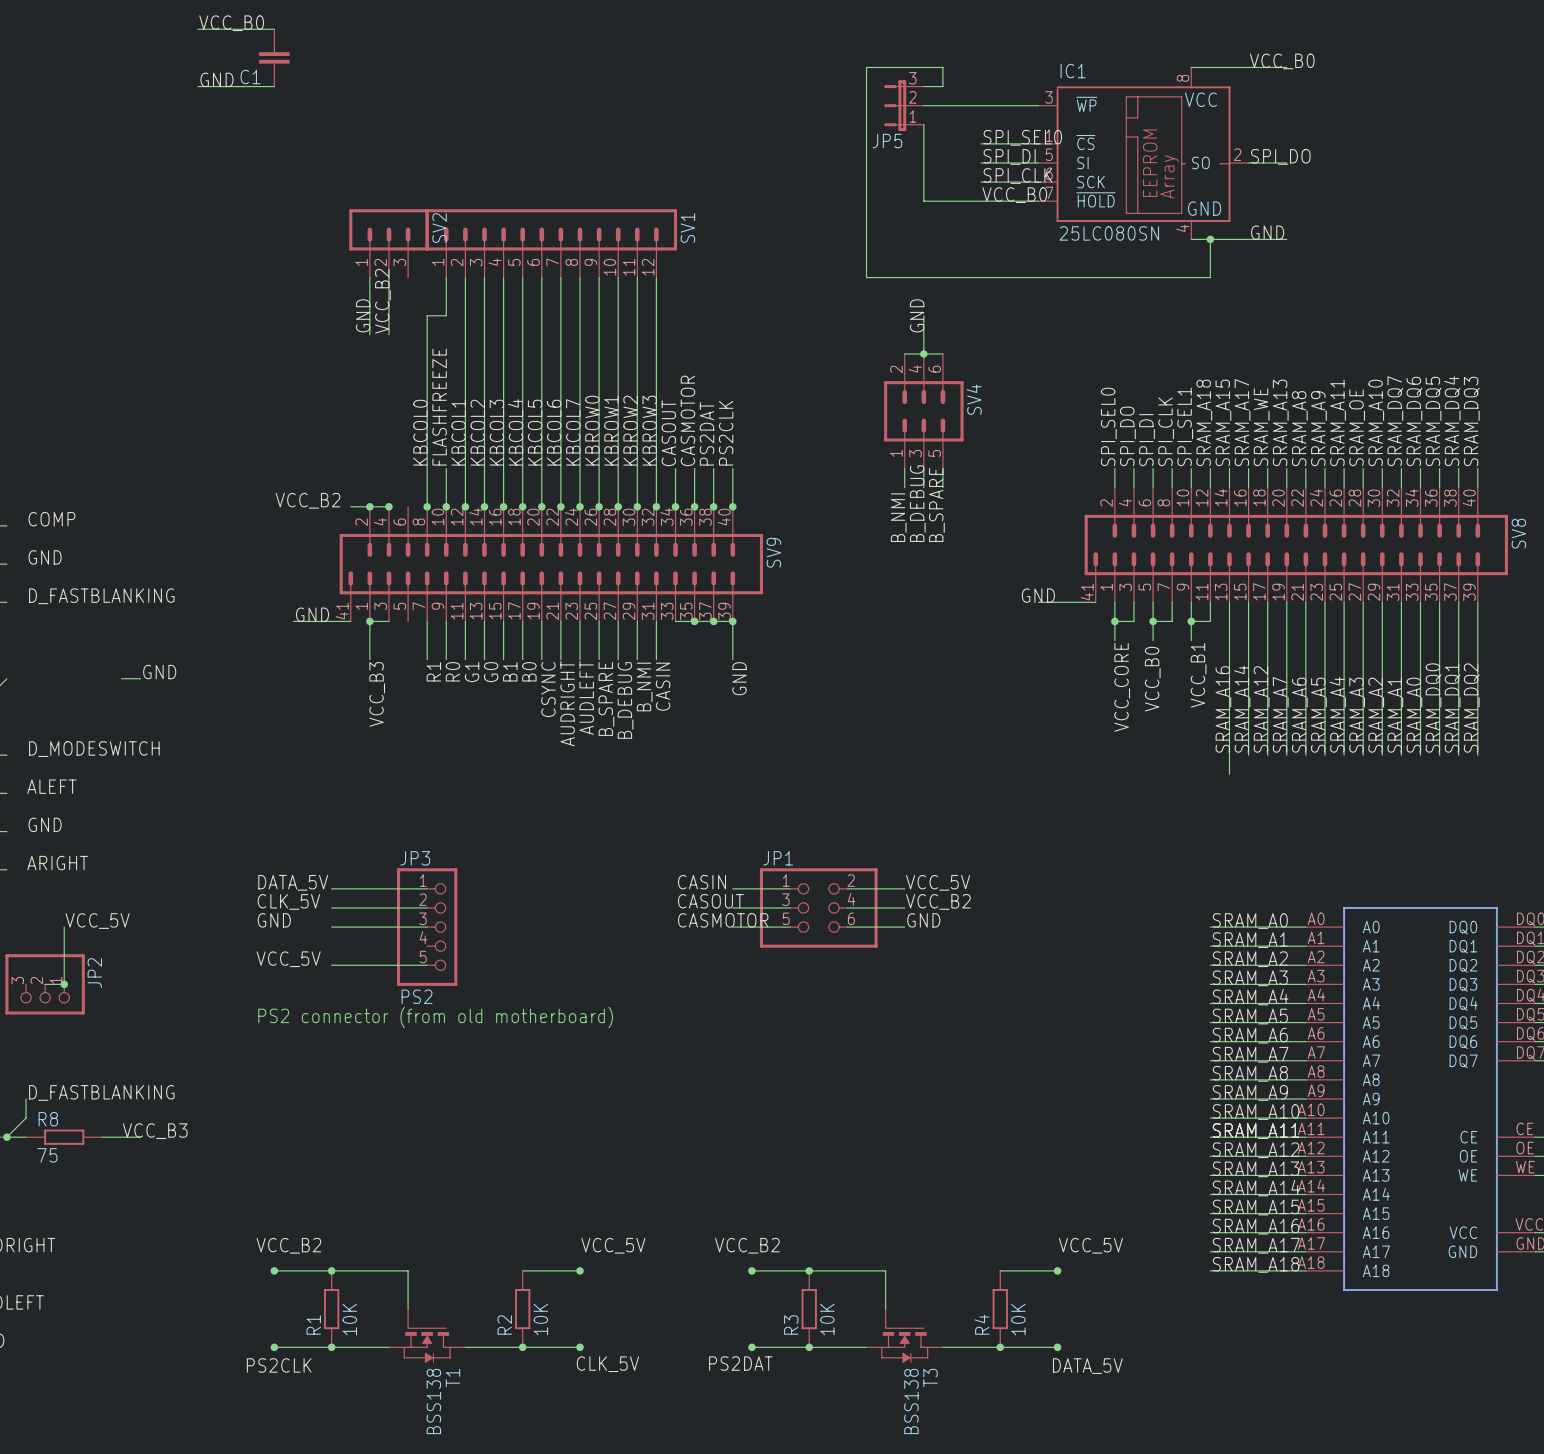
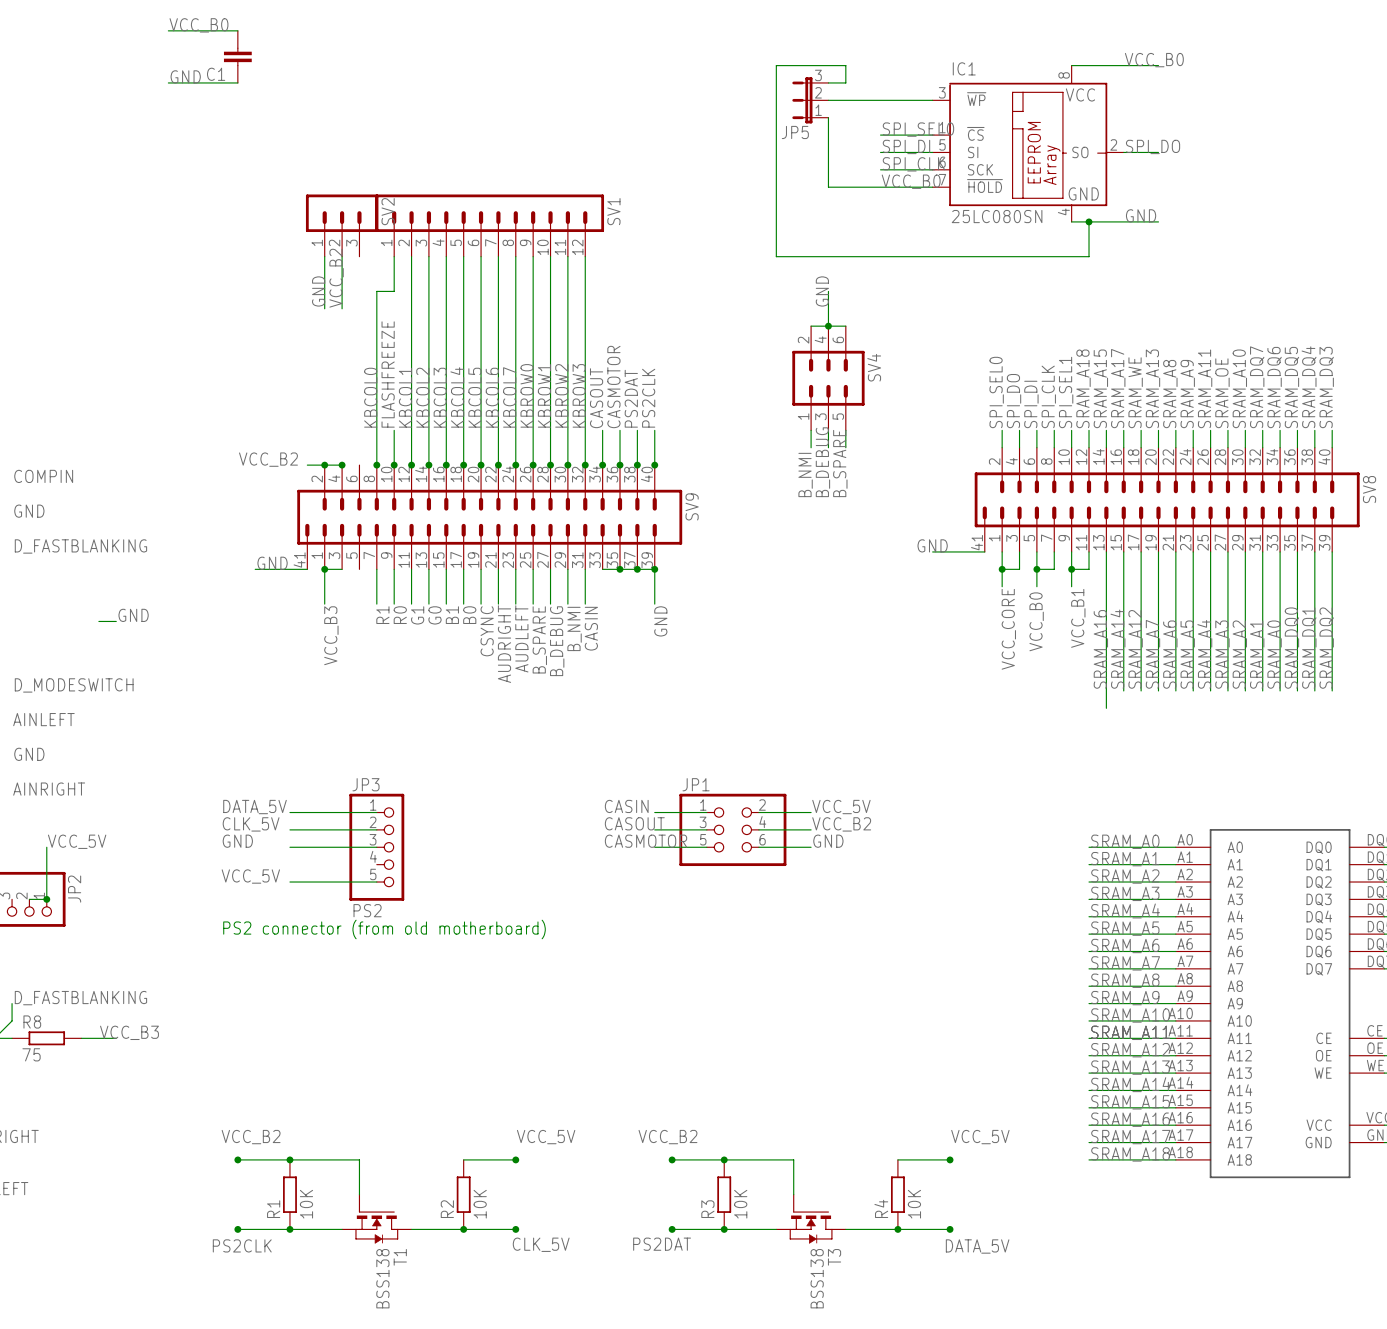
label: COMP (51, 519) -> COMPIN (43, 476)
label: ALEFT (51, 786) -> AINLEFT (43, 719)
label: ARIGHT (57, 863) -> AINRIGHT (49, 789)

